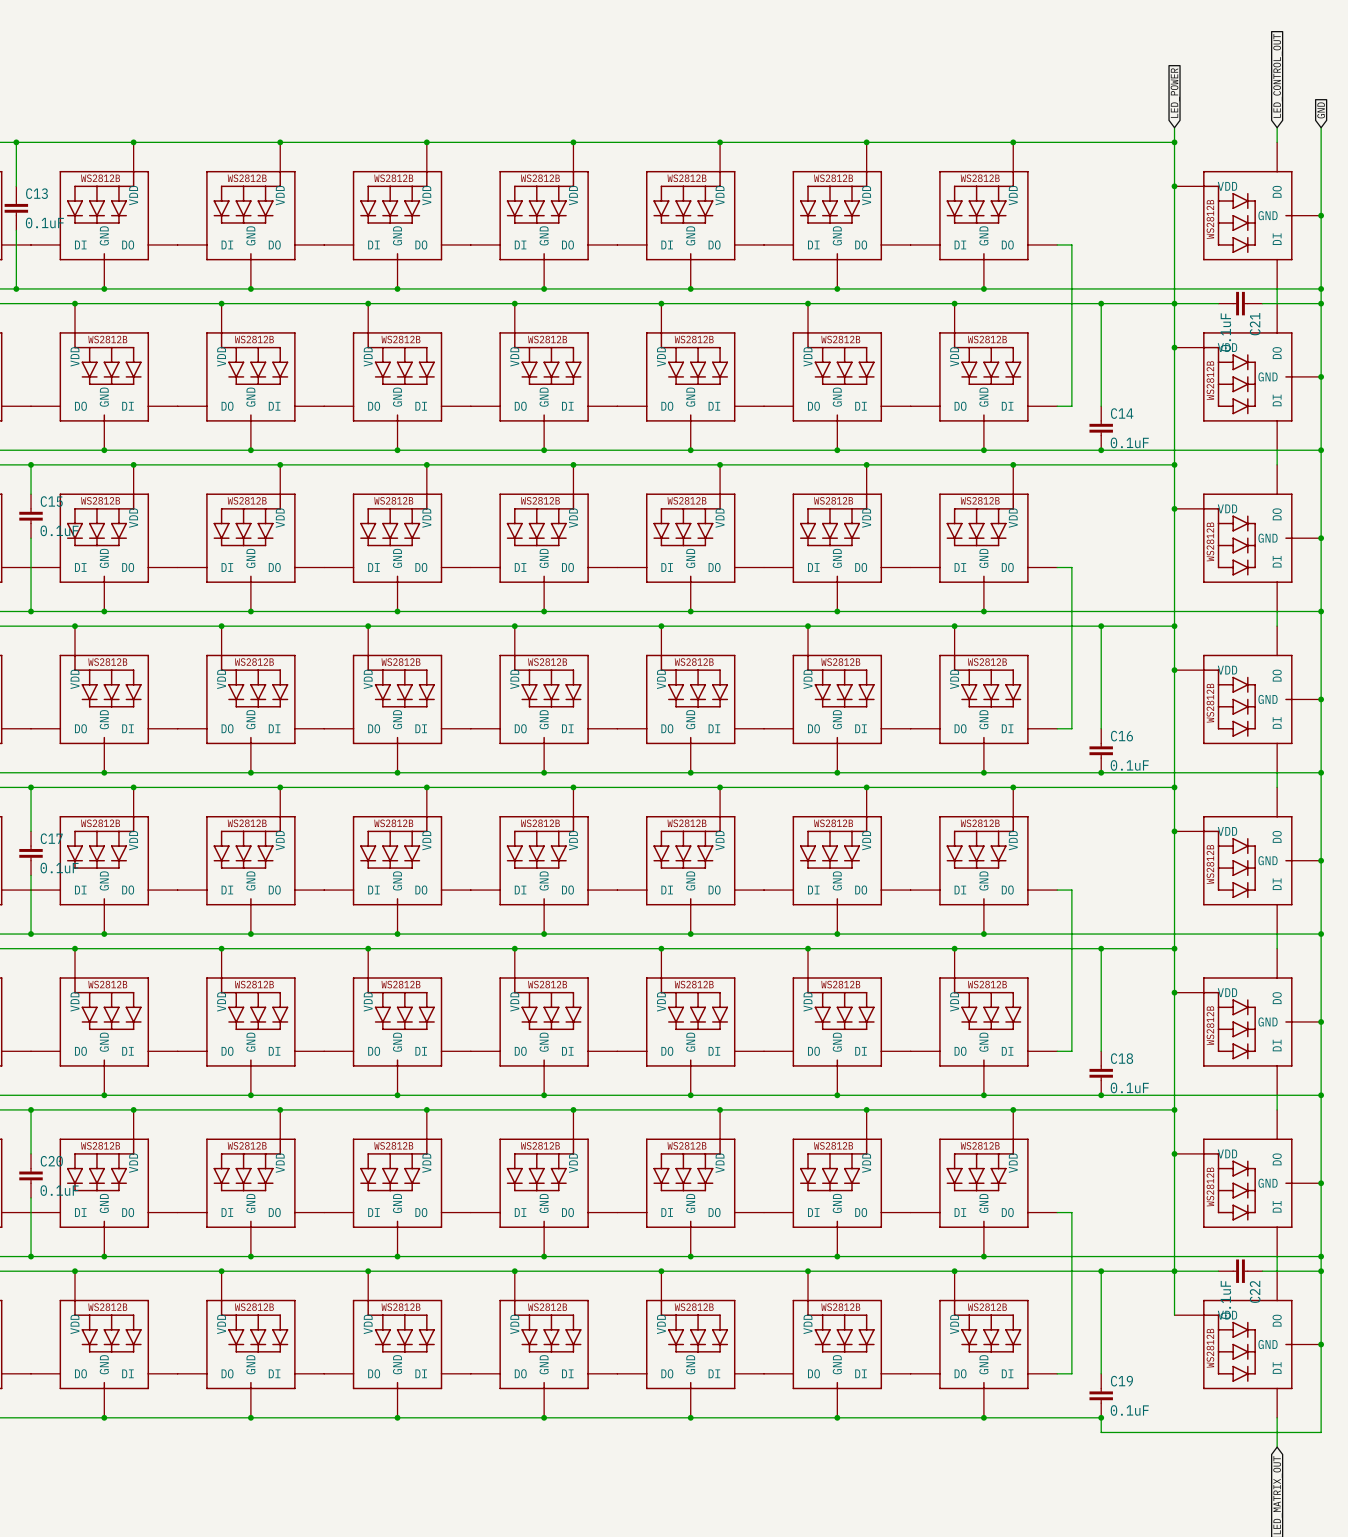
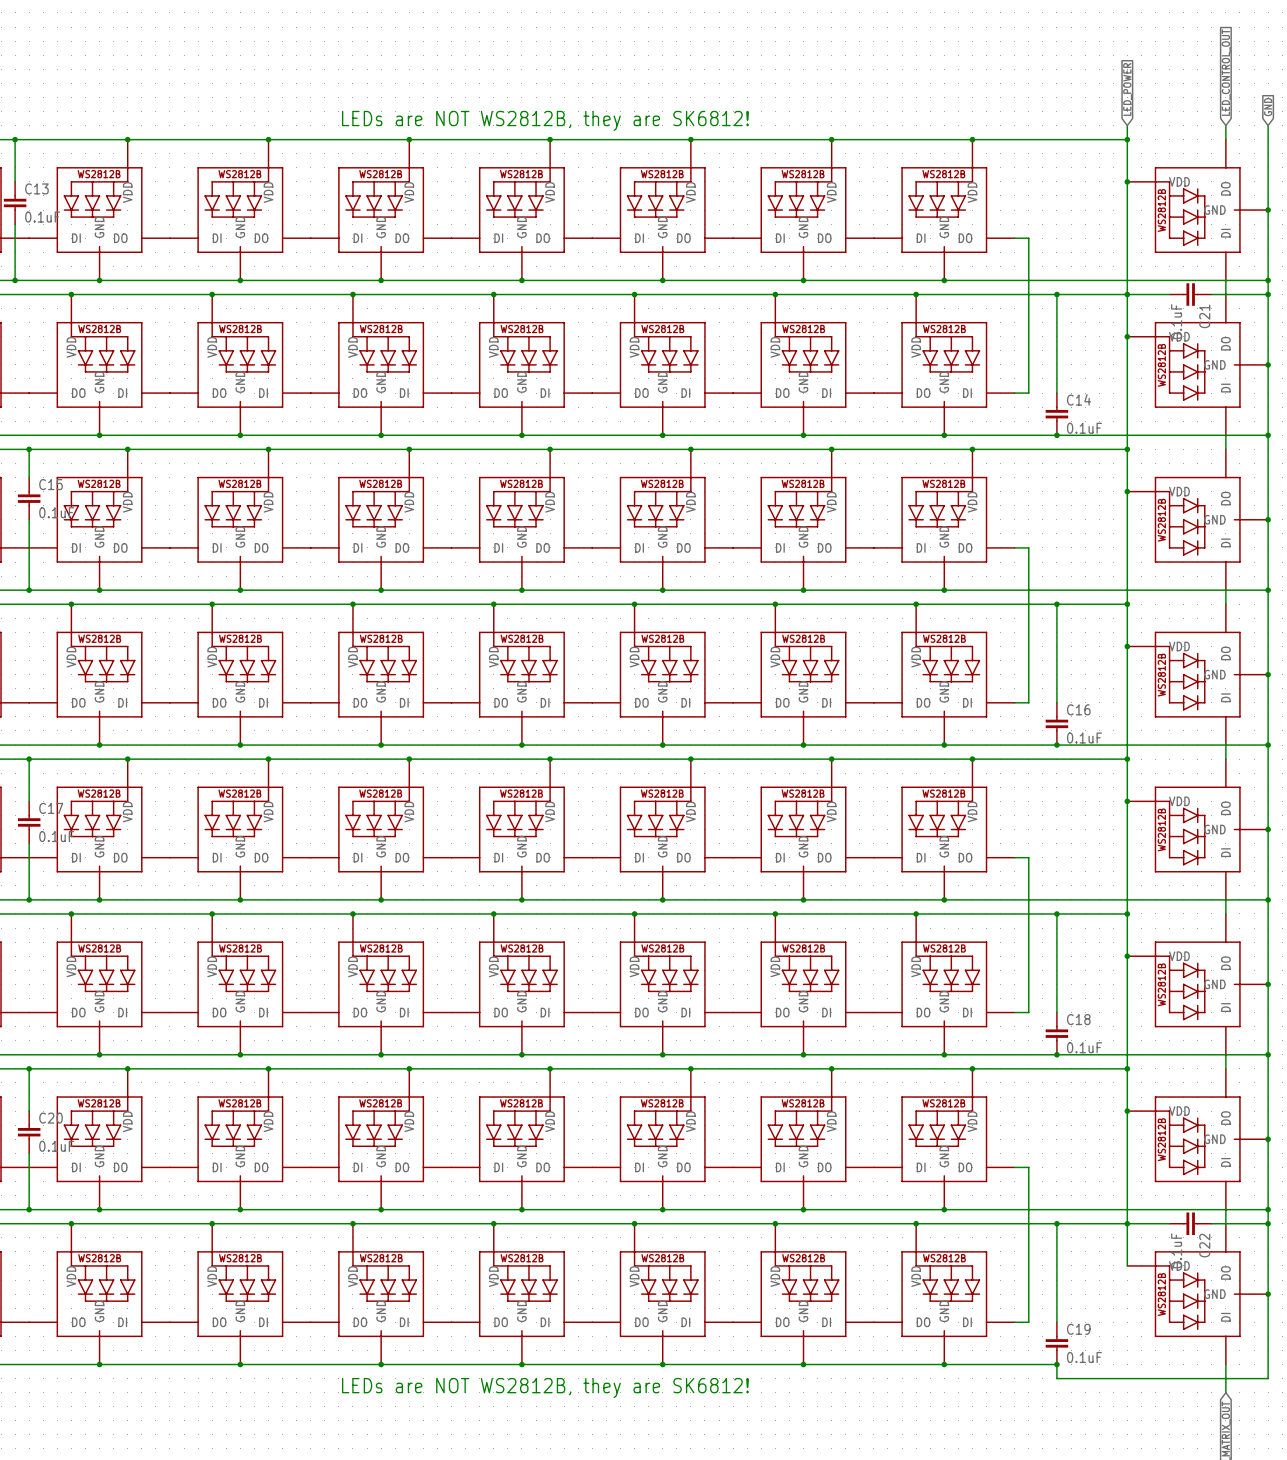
text: none -> LEDs are NOT WS2812B, they are SK6812! (545, 120)
text: none -> LEDs are NOT WS2812B, they are SK6812! (545, 1387)

